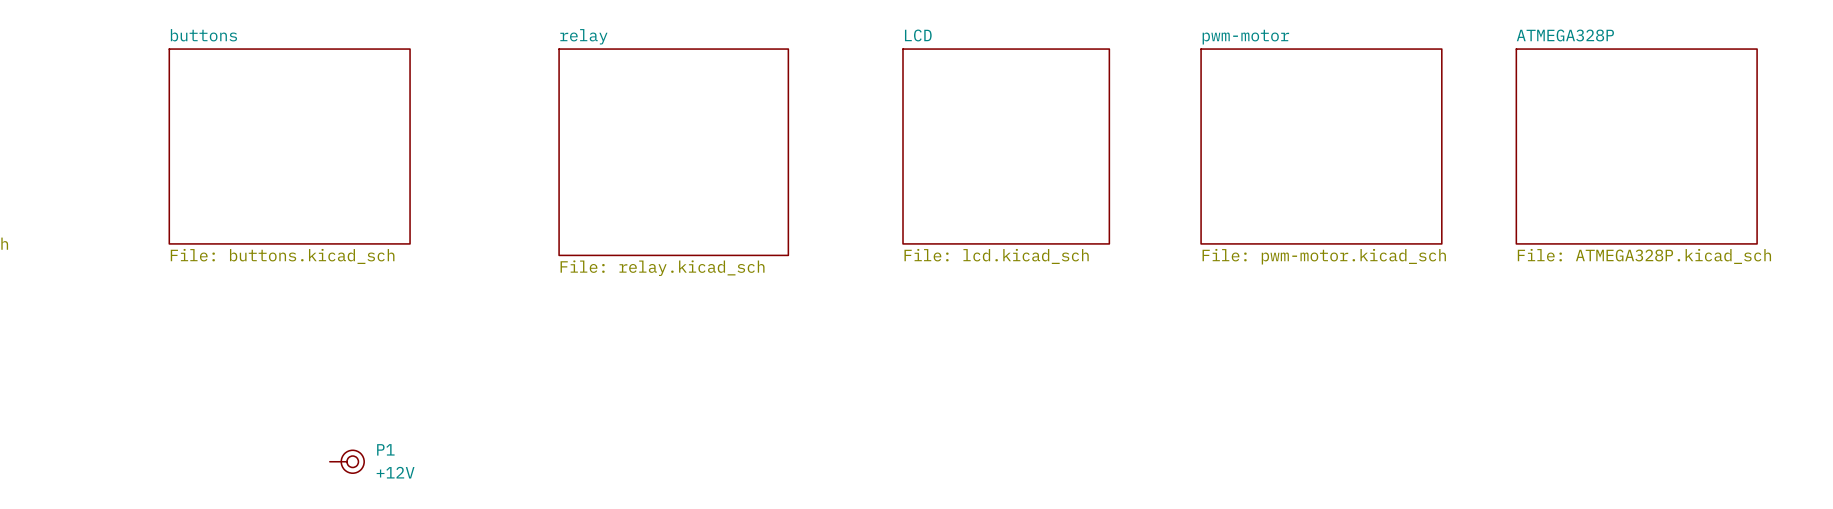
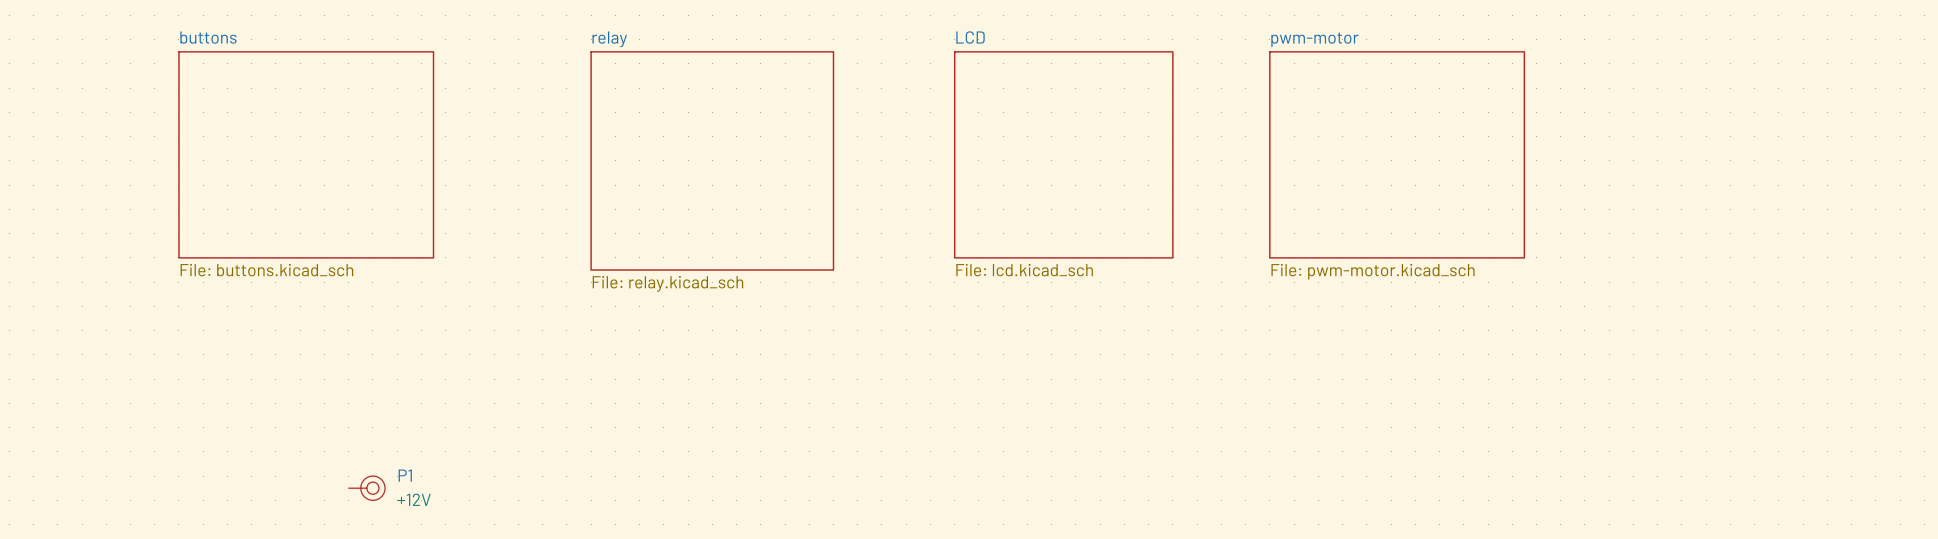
sheet ATMEGA328P: File: ATMEGA328P.kicad_sch (1636, 146) -> none

